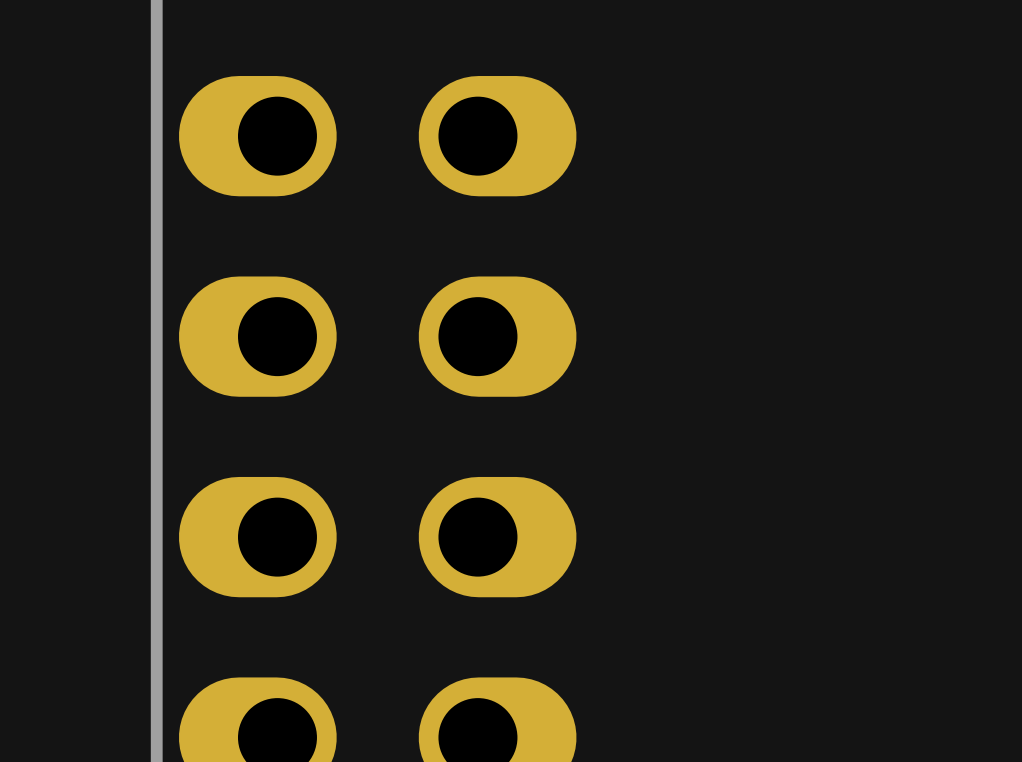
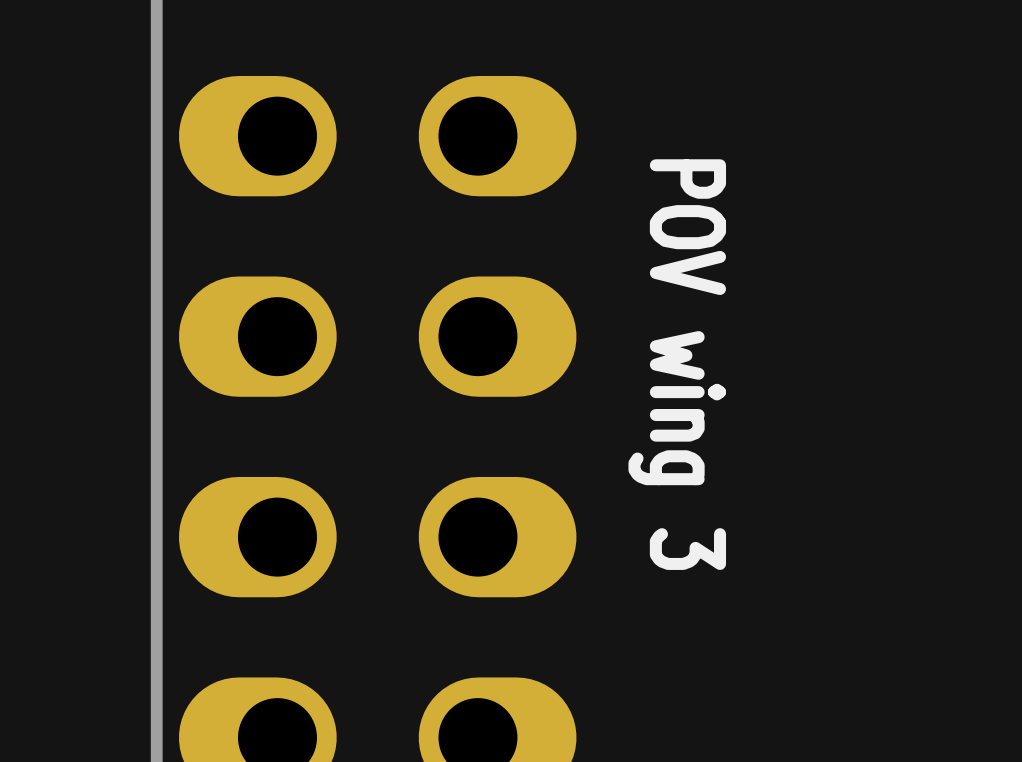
text: none -> POV wing 3 (677, 364)

